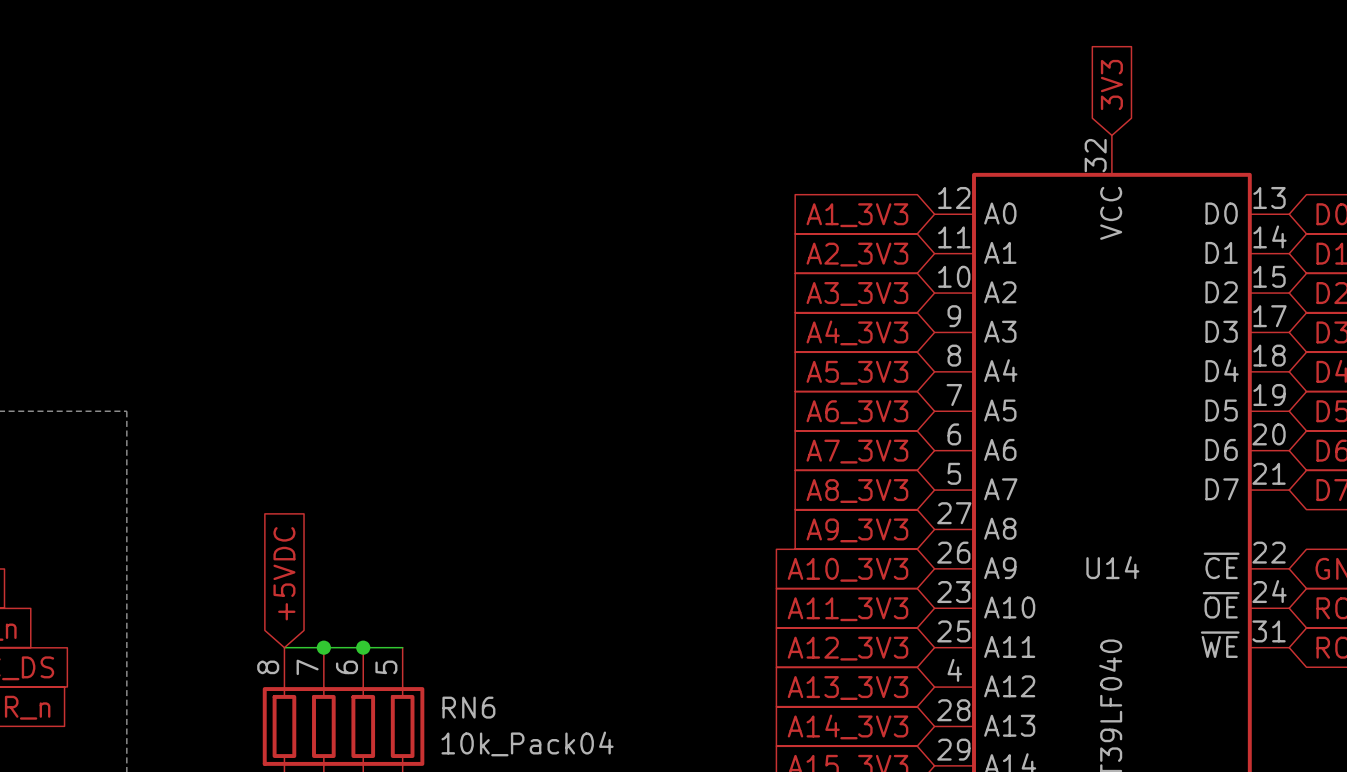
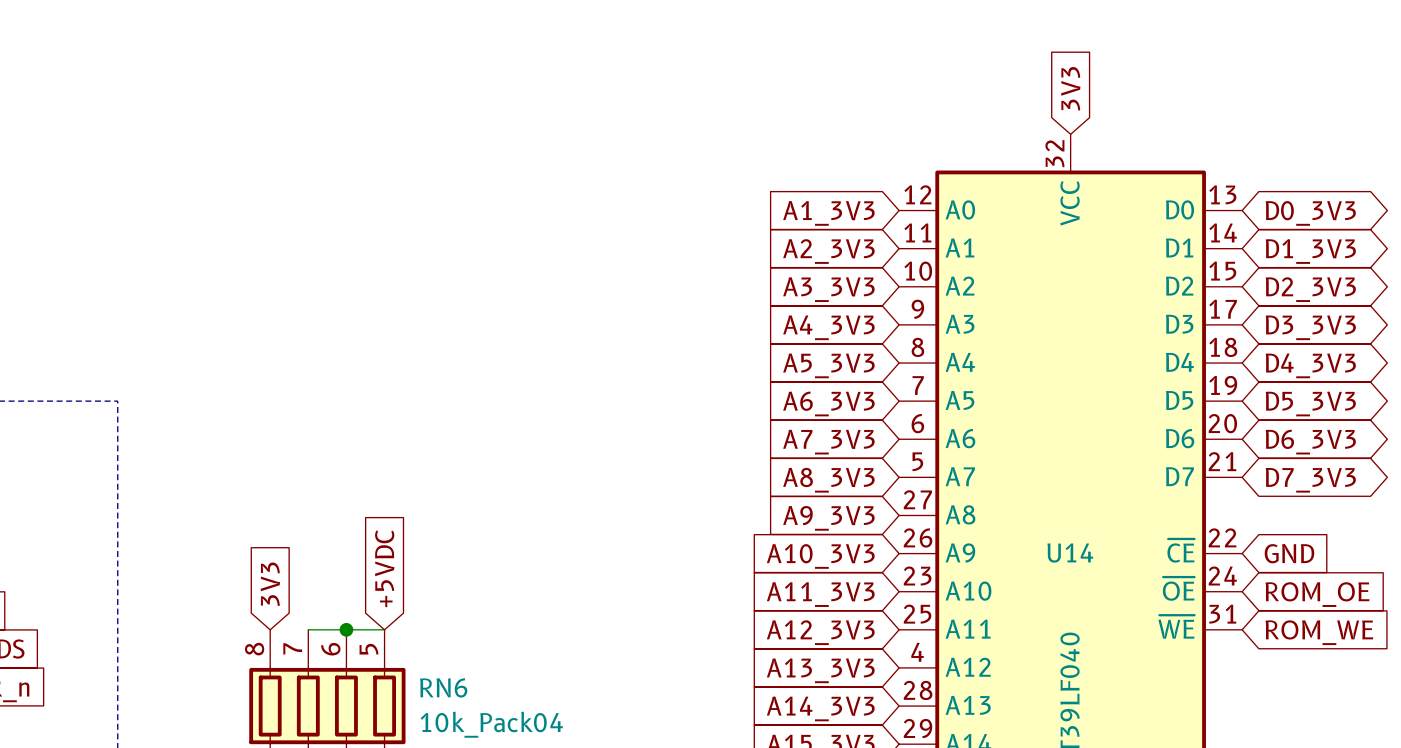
global label: +5VDC (284, 573) -> 3V3 (270, 584)
global label: none -> +5VDC (384, 568)
wire: (284, 647) (323, 647) -> none
junction: (323, 647) -> none

